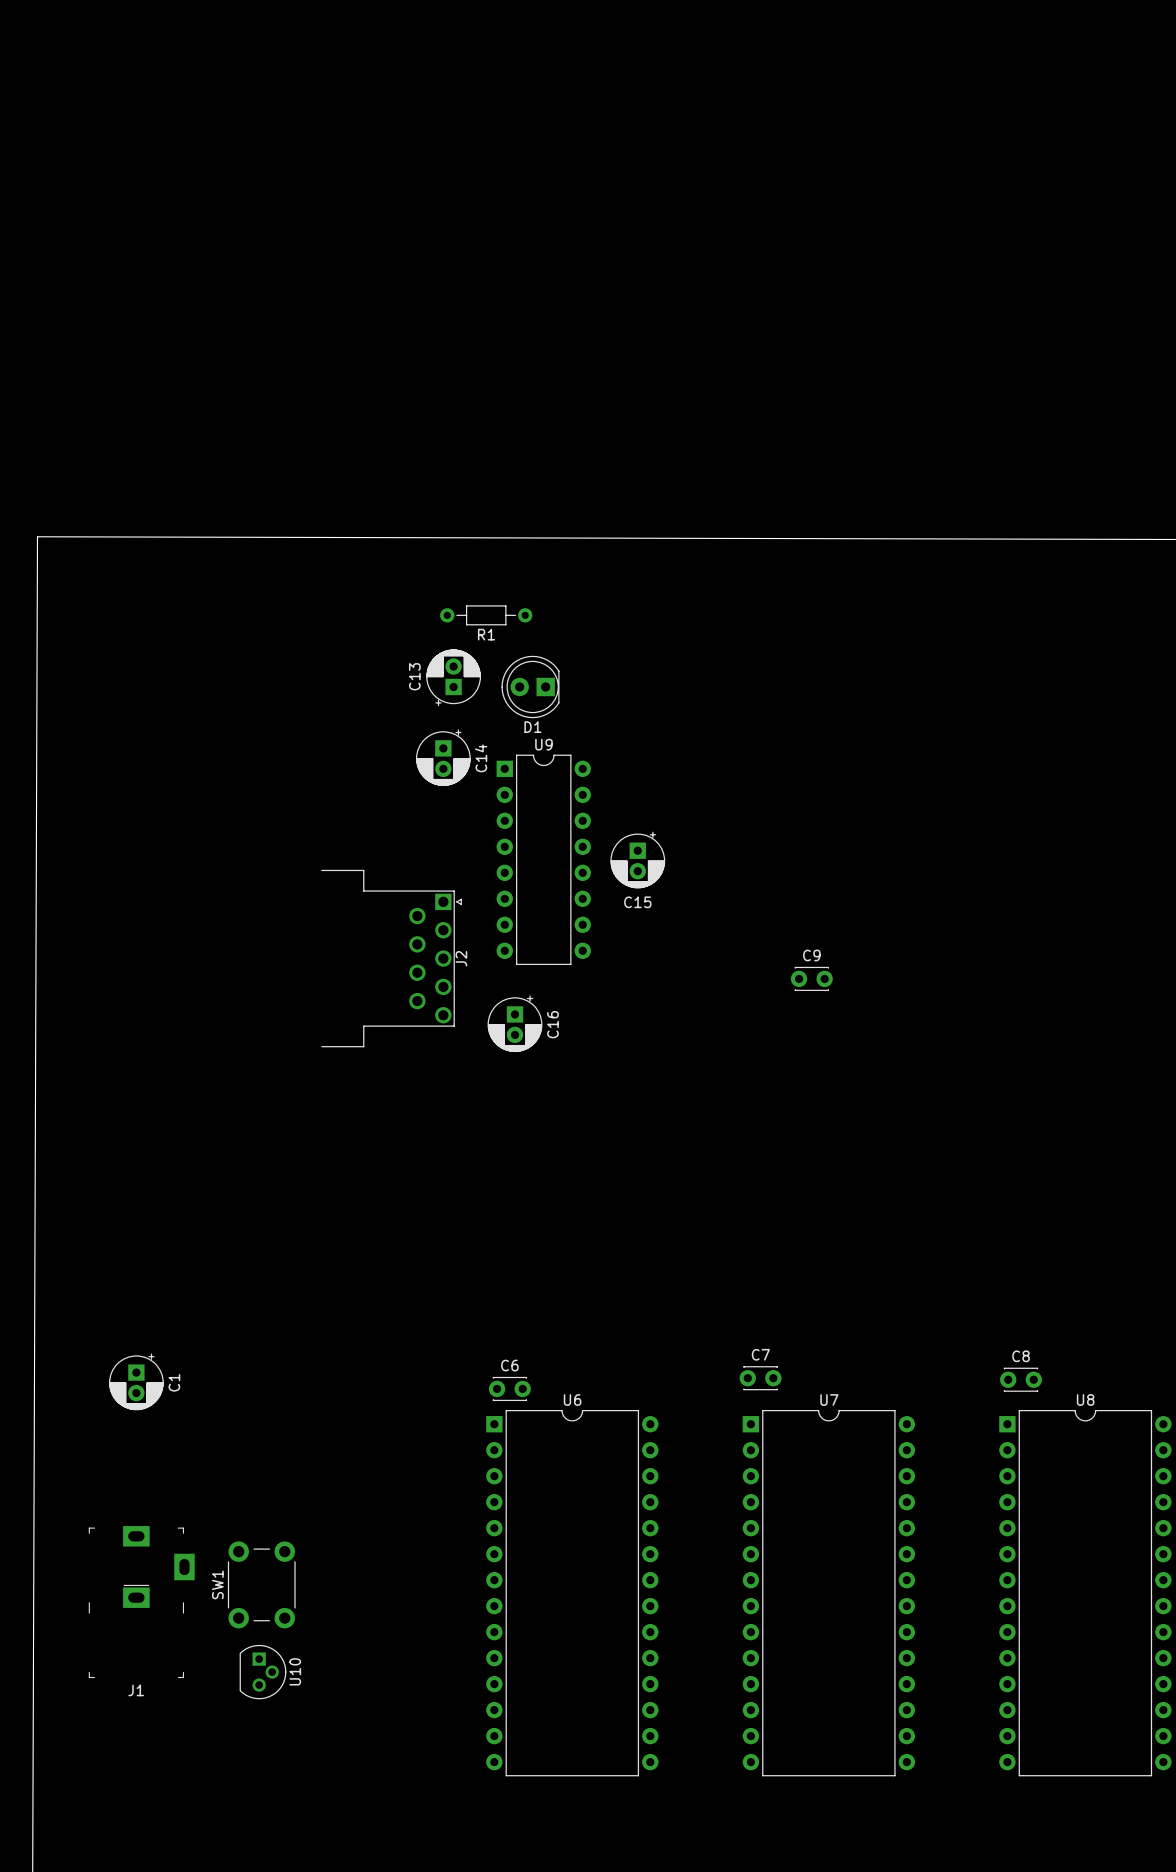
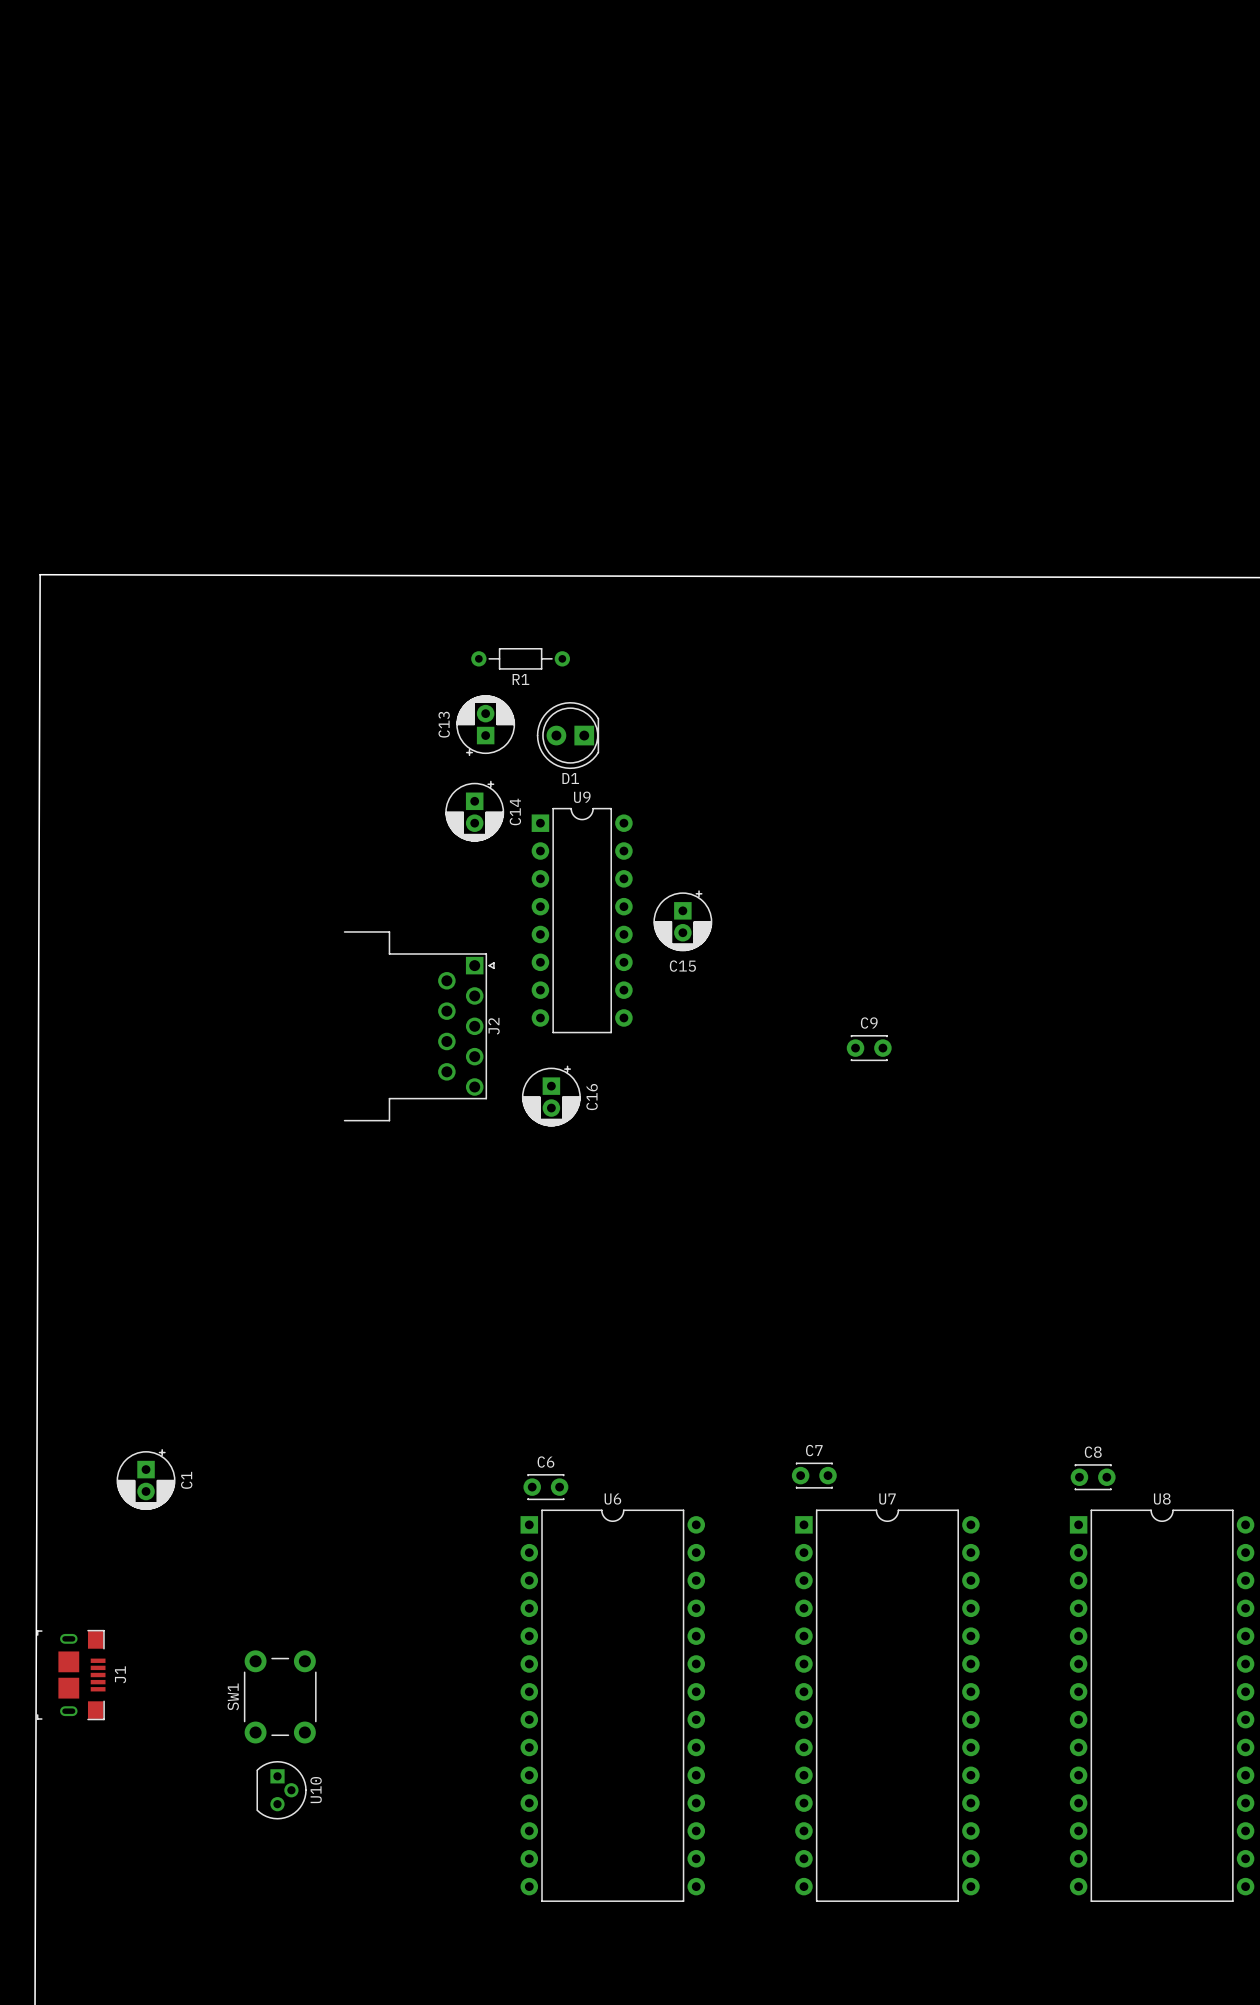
J1 footprint: [88, 1526, 195, 1679] -> [37, 1630, 106, 1721]
J1 name position: J1 (136, 1690) -> J1 (120, 1674)

